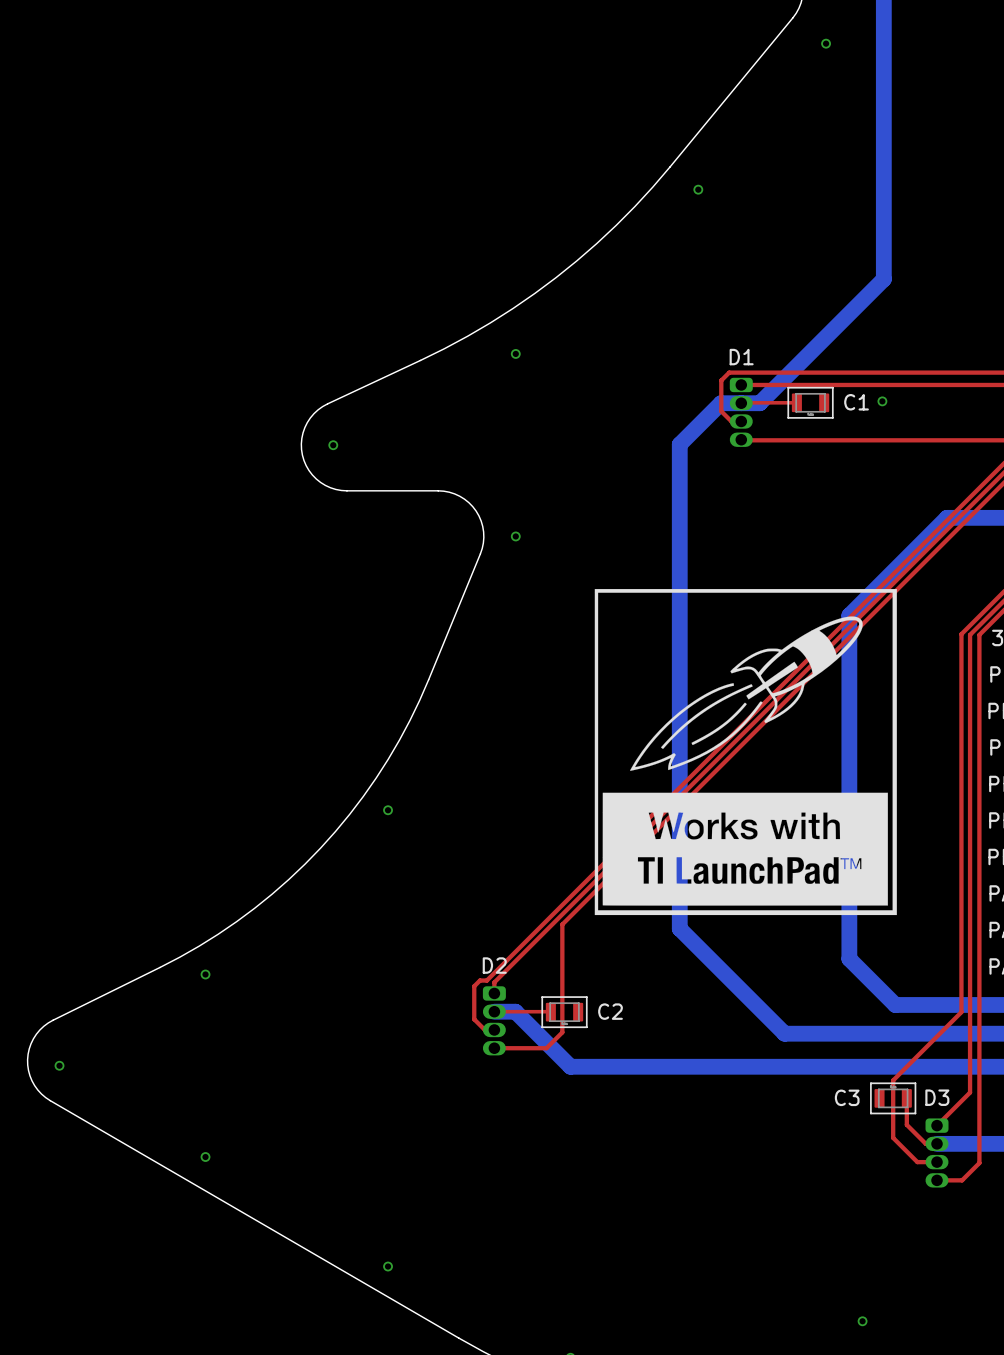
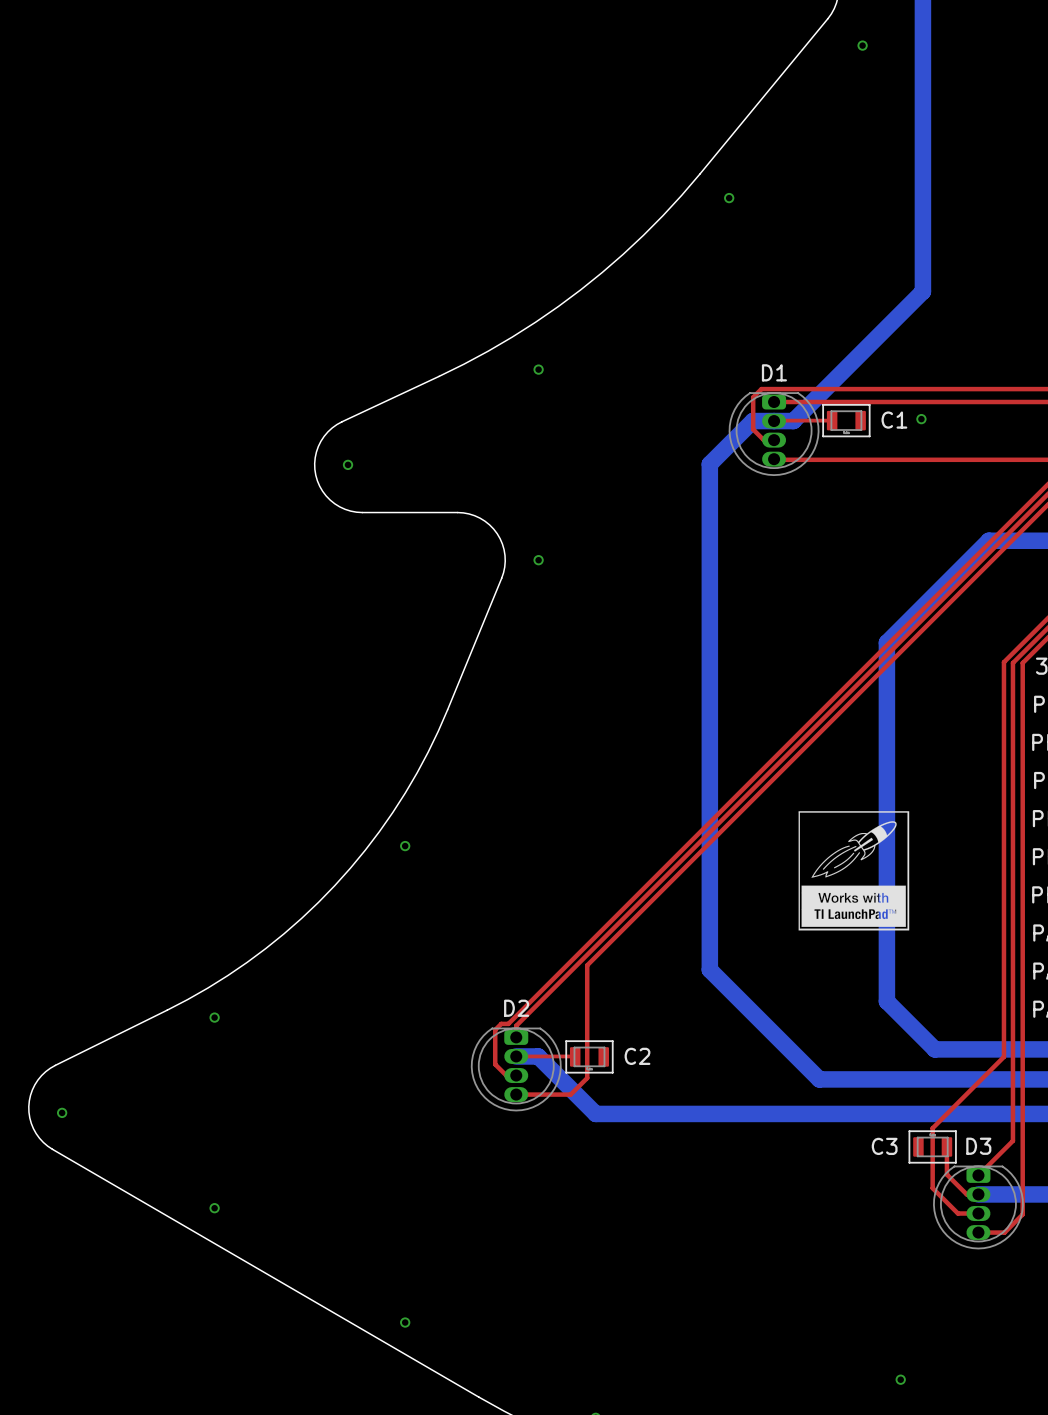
D1 side: bottom (741, 412) -> top (774, 434)
drawing: [594, 589, 897, 916] -> none
drawing: none -> [798, 811, 910, 931]
D2 side: bottom (494, 1020) -> top (516, 1069)
D3 side: bottom (937, 1152) -> top (978, 1207)

